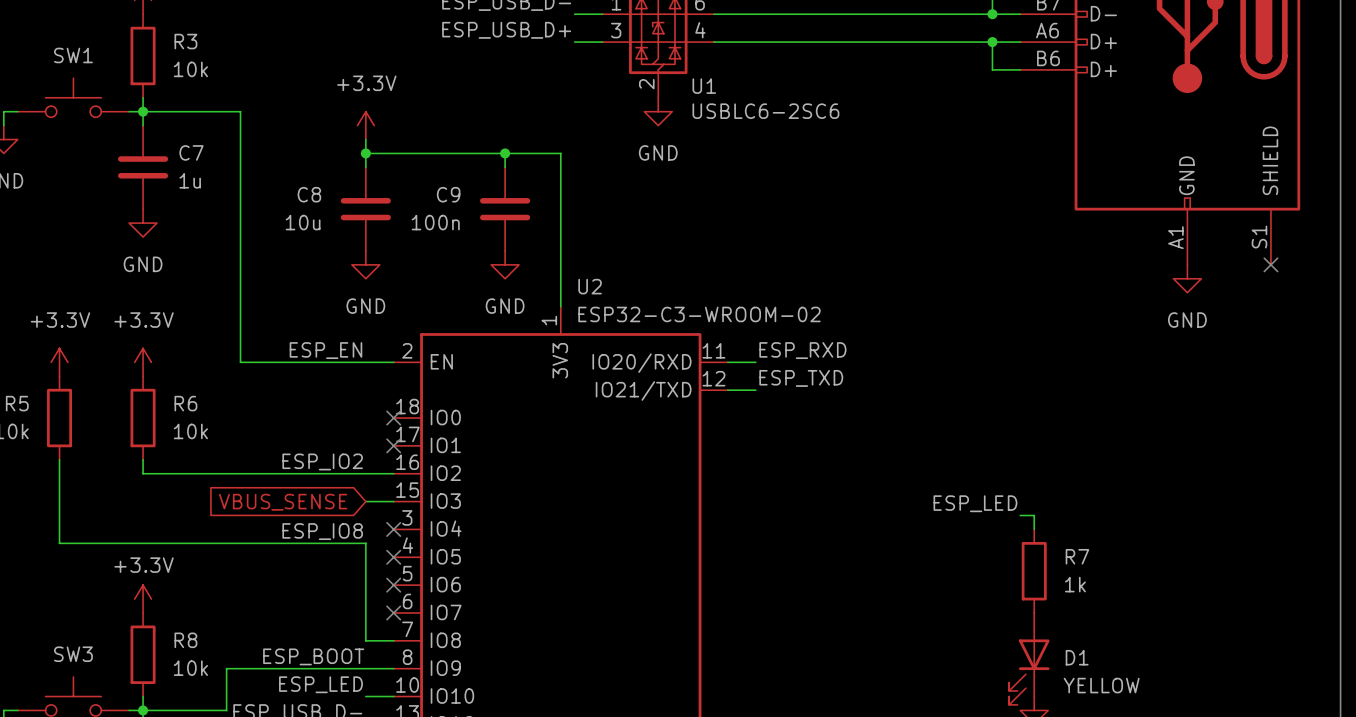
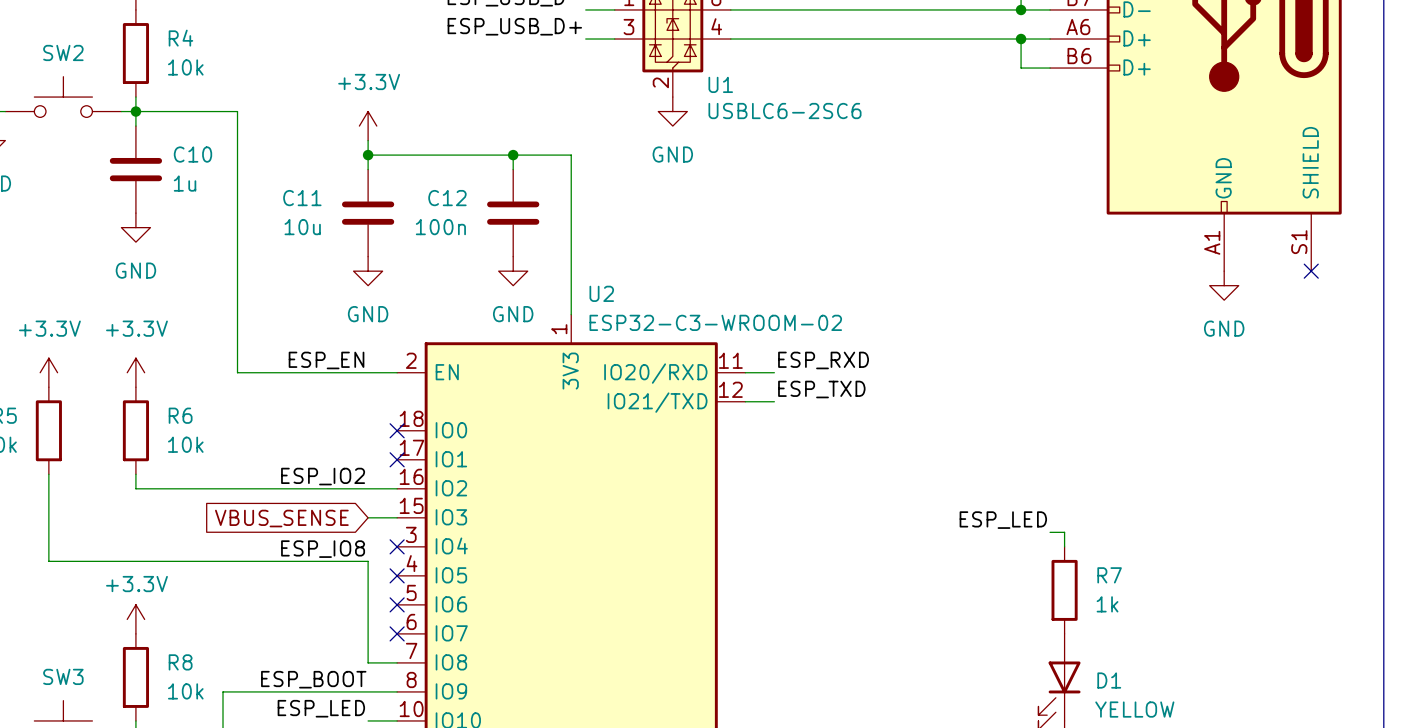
R3 name: R3 (185, 41) -> R4 (180, 38)
SW1 name: SW1 (73, 55) -> SW2 (63, 52)
C7 name: C7 (191, 152) -> C10 (192, 154)
C8 name: C8 (309, 194) -> C11 (302, 198)
C9 name: C9 (448, 194) -> C12 (447, 198)

